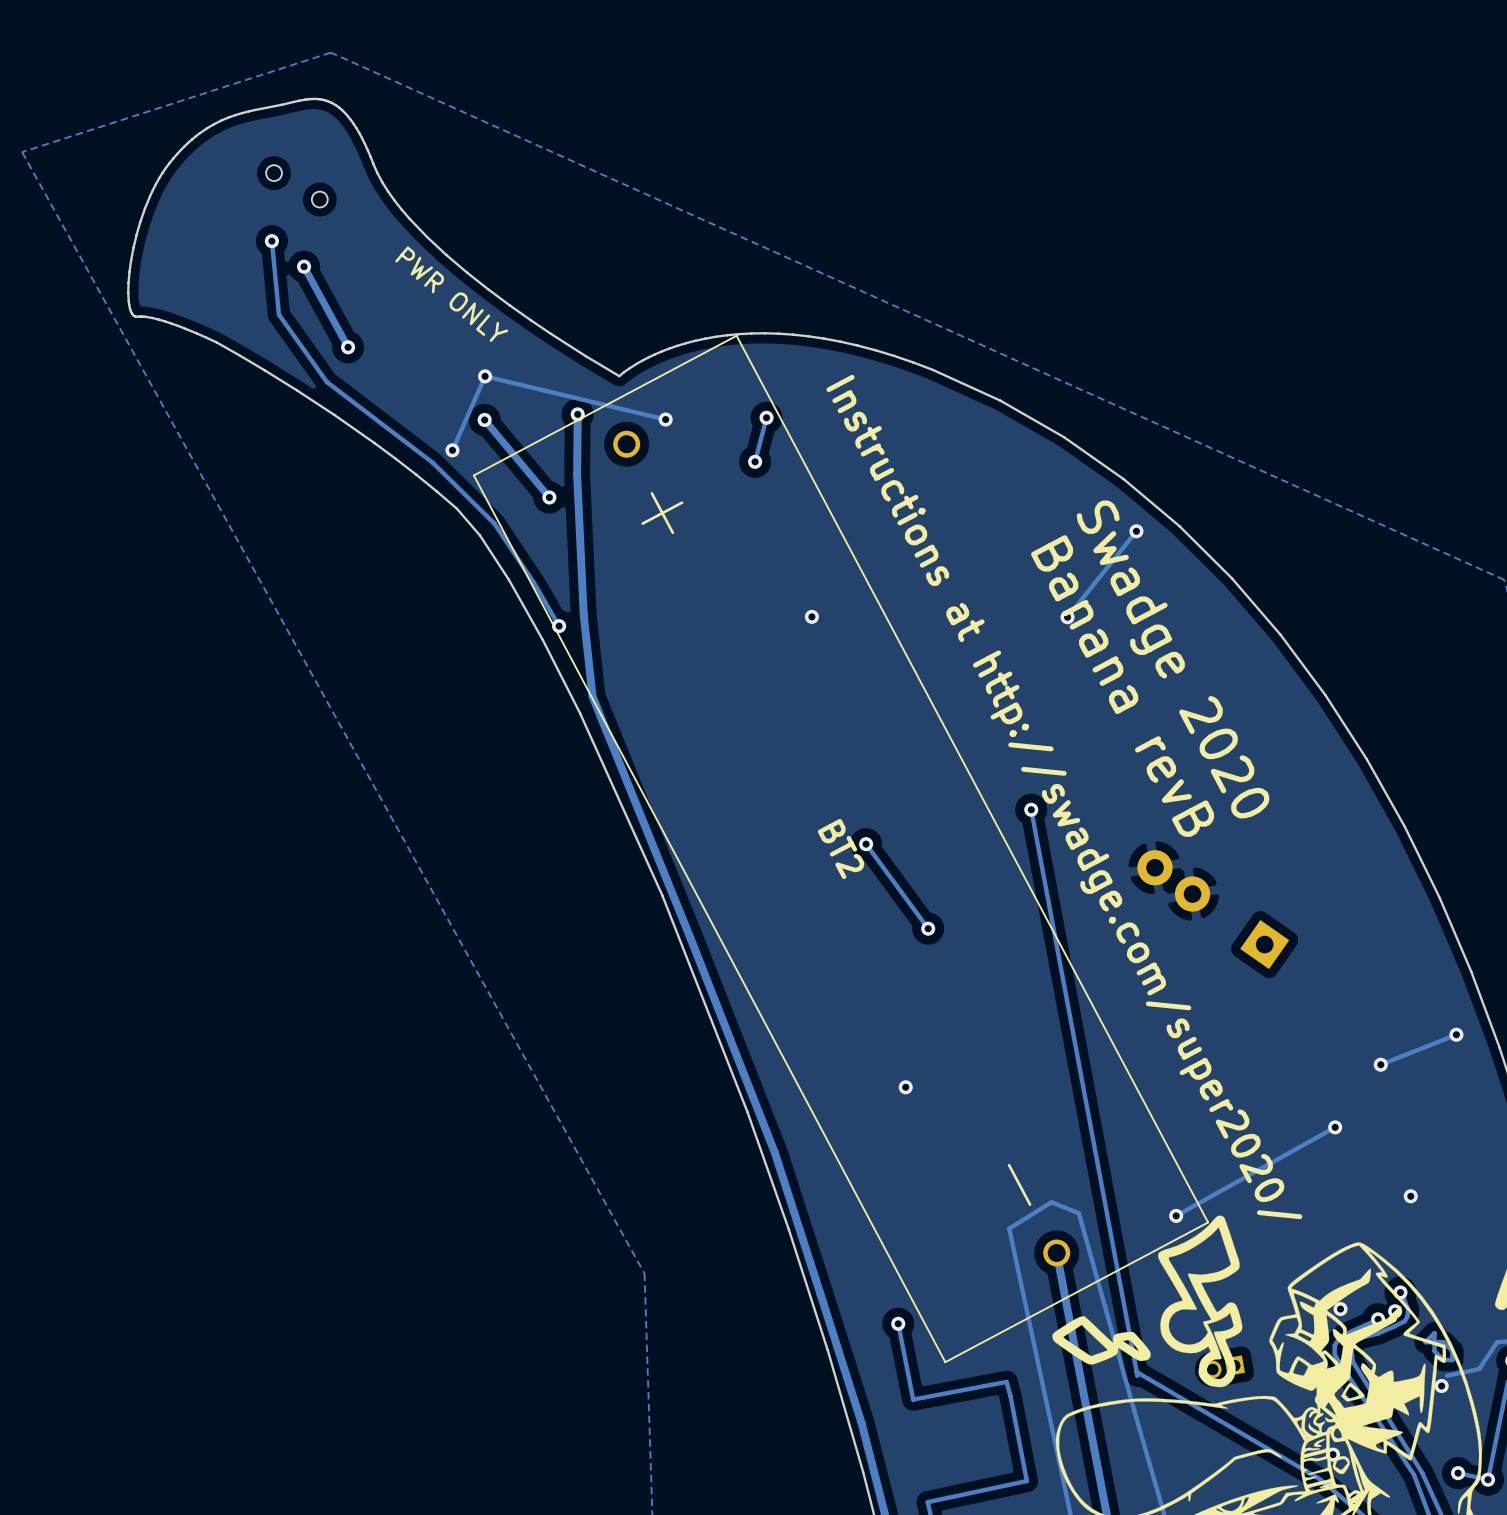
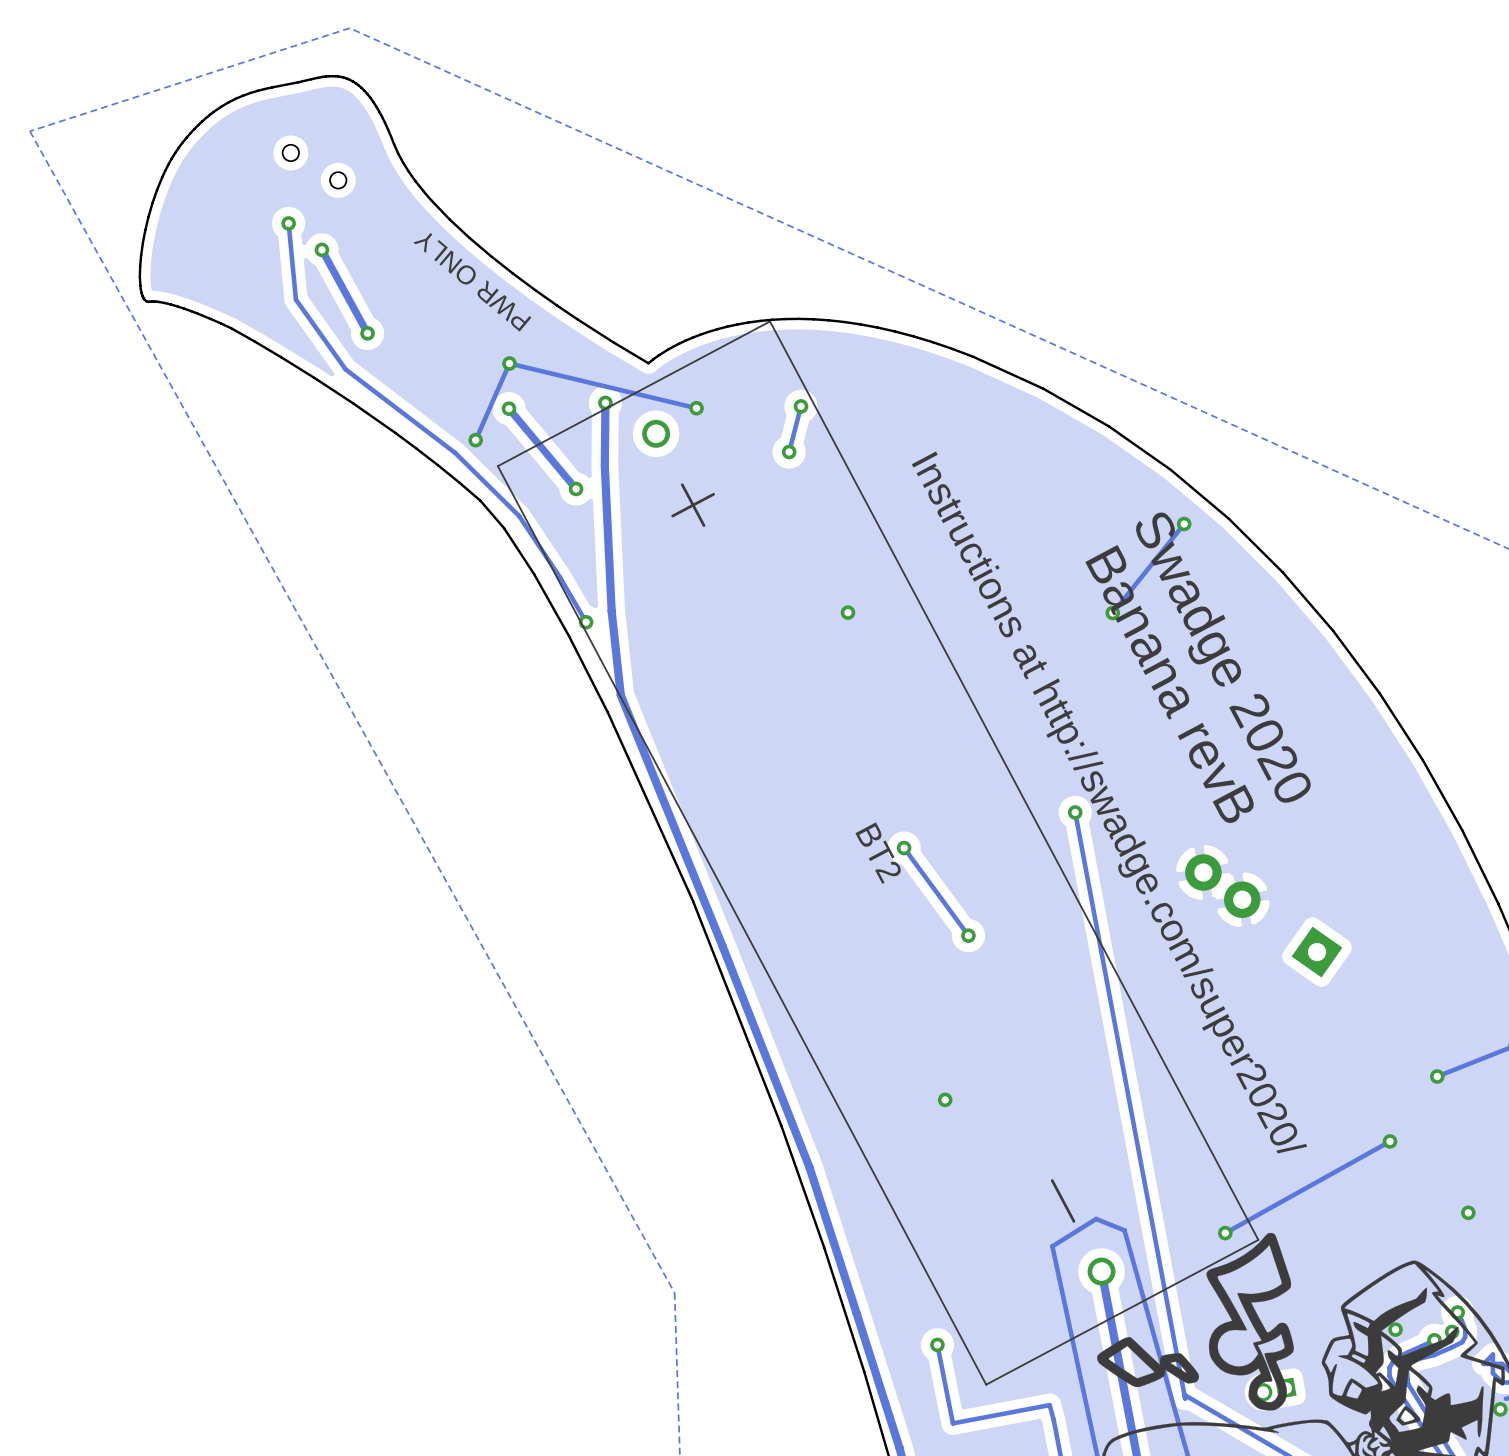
text rotation: 0° (451, 294) -> 180° (472, 282)

